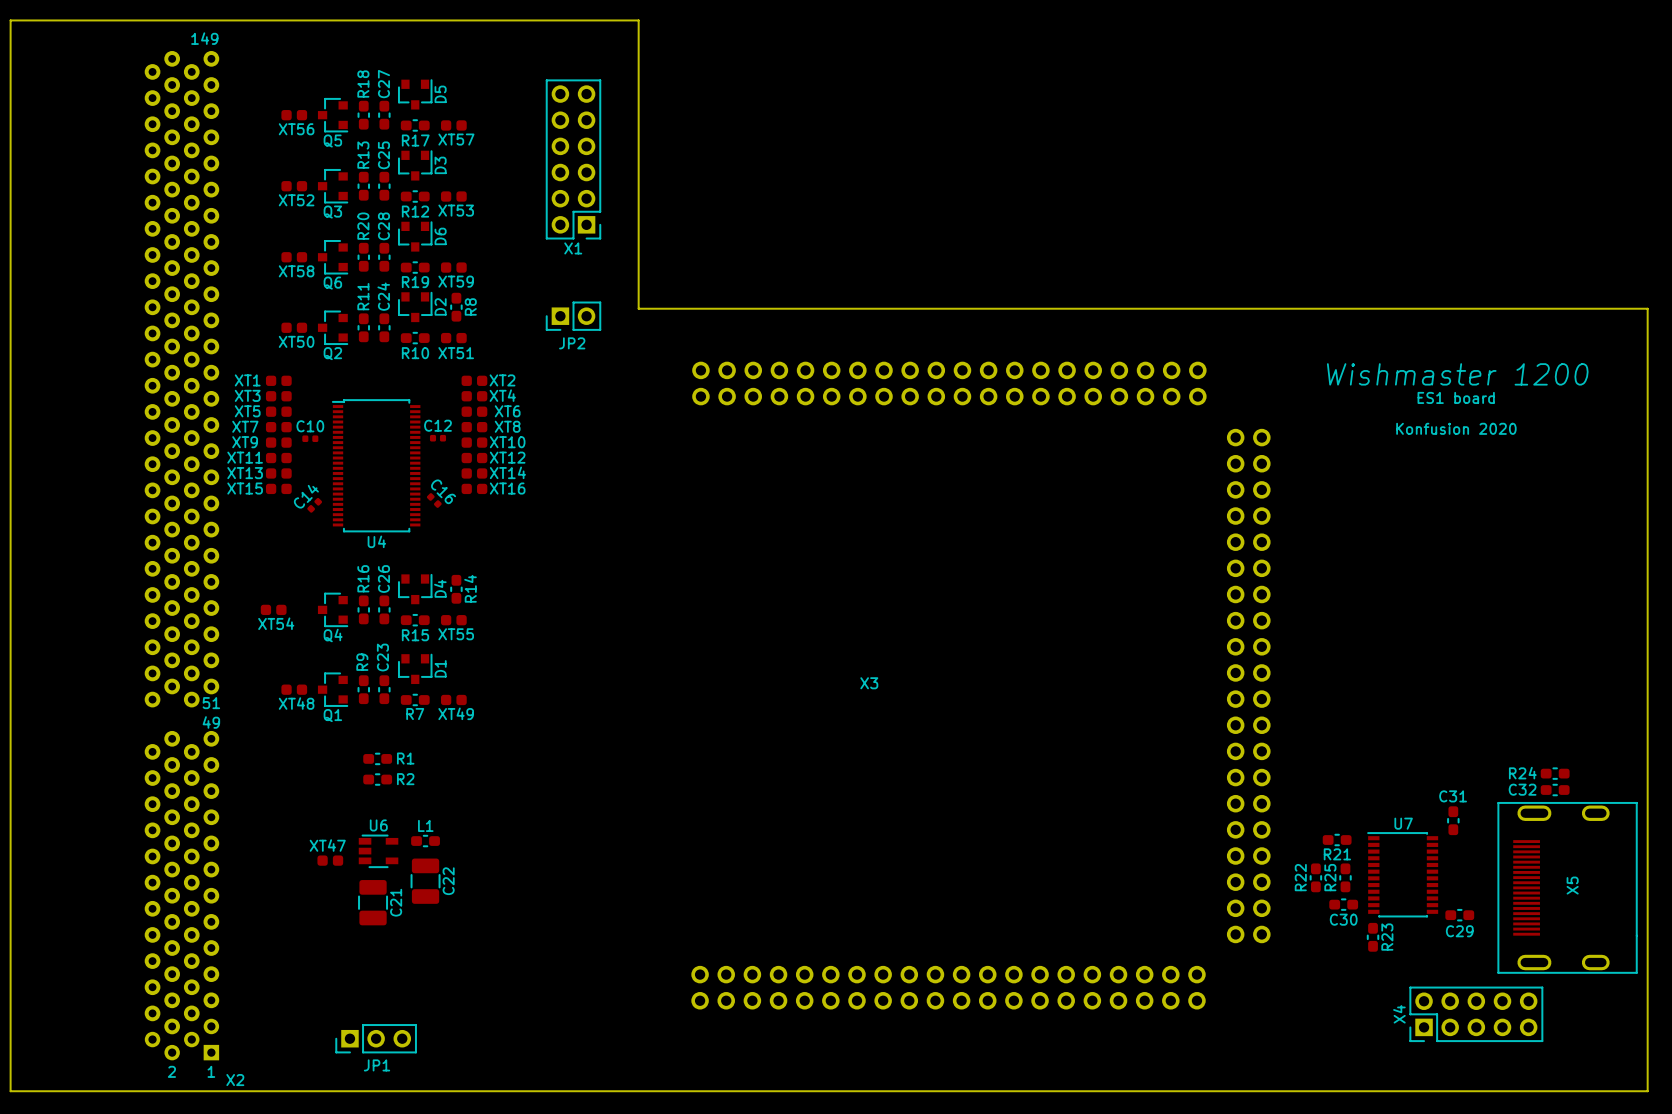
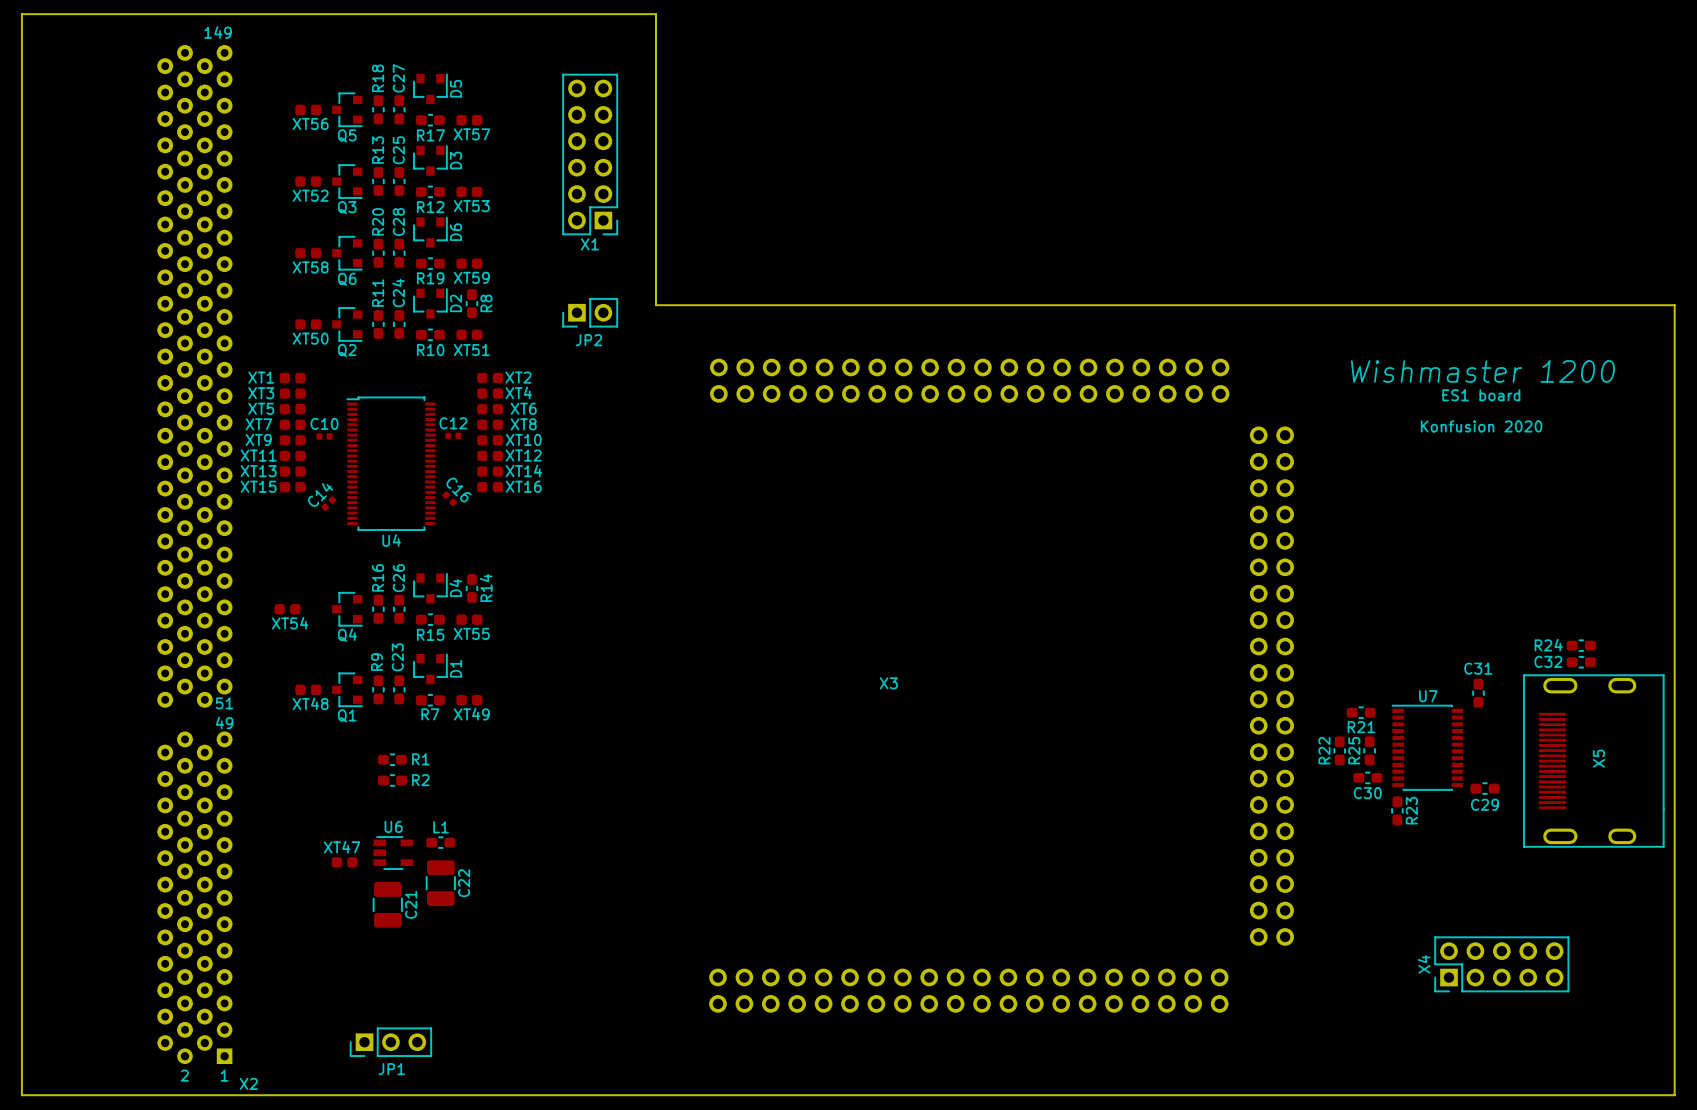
R24 position: (1555, 773) -> (1581, 645)
C32 position: (1555, 790) -> (1581, 662)
C31 position: (1453, 820) -> (1478, 693)
R21 position: (1337, 840) -> (1361, 712)
U7 position: (1402, 874) -> (1427, 747)
R22 position: (1315, 877) -> (1339, 750)
R25 position: (1345, 877) -> (1369, 750)
X5 position: (1567, 887) -> (1593, 761)
C30 position: (1343, 904) -> (1367, 777)
C29 position: (1459, 915) -> (1484, 788)
R23 position: (1373, 937) -> (1397, 810)
X4 position: (1476, 1014) -> (1501, 964)

